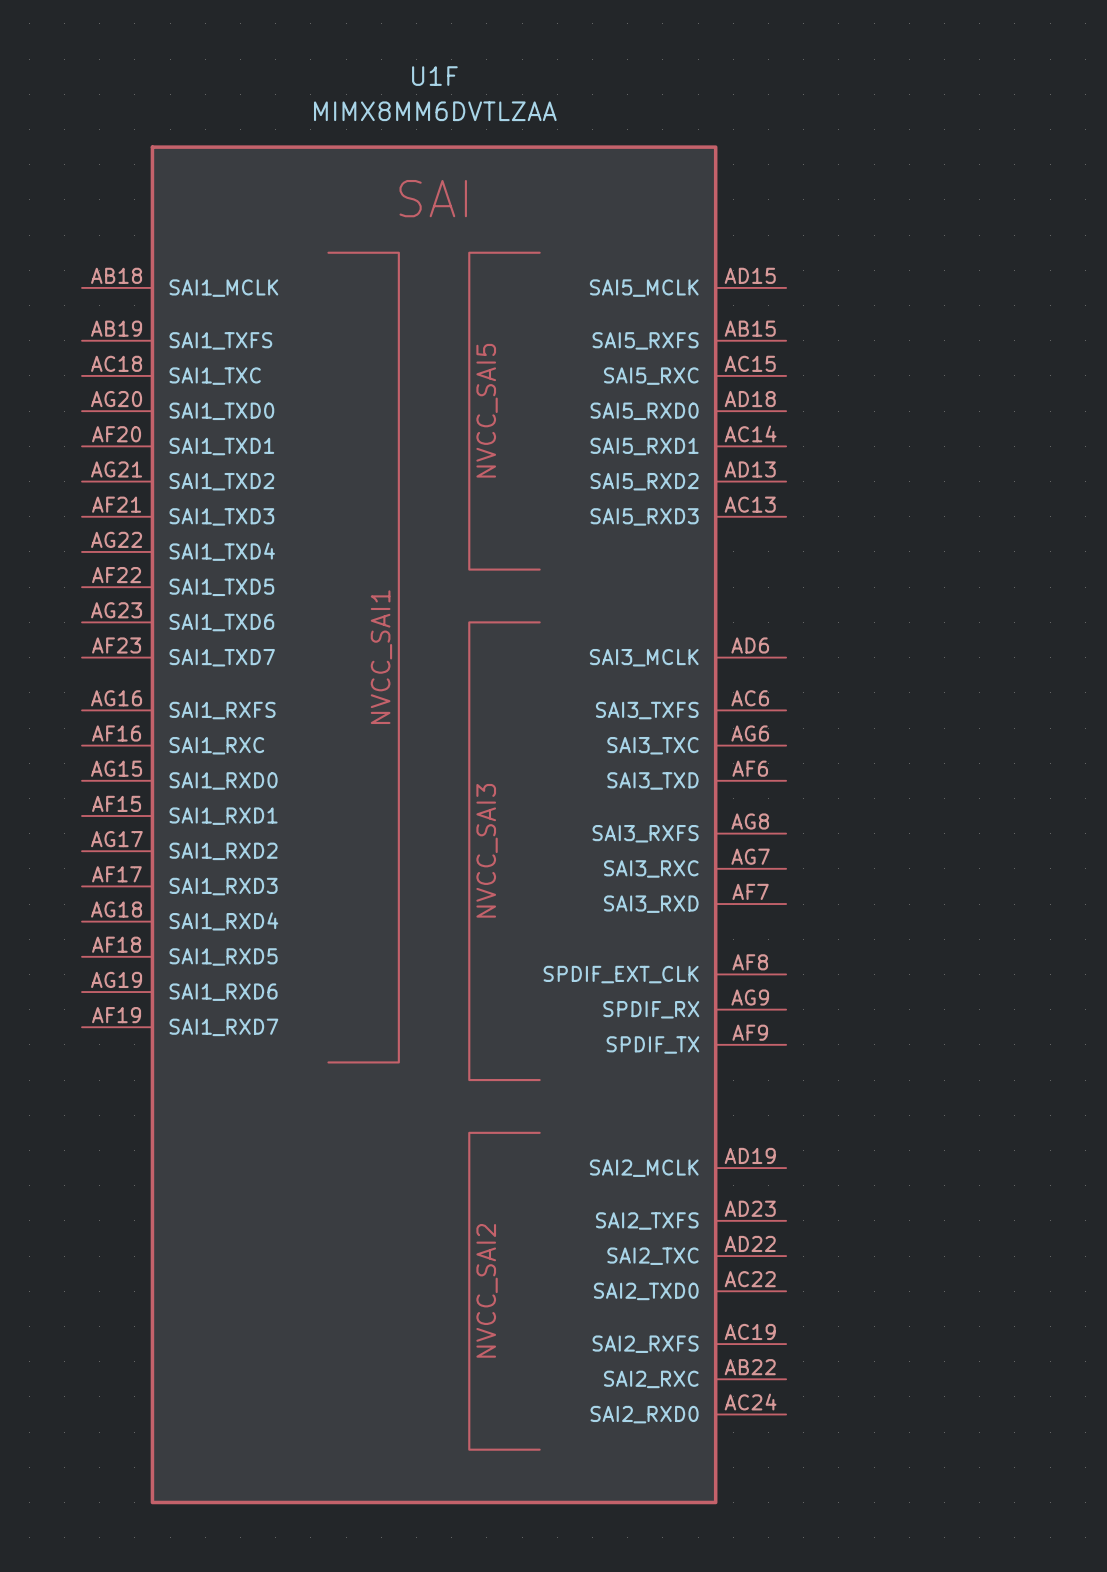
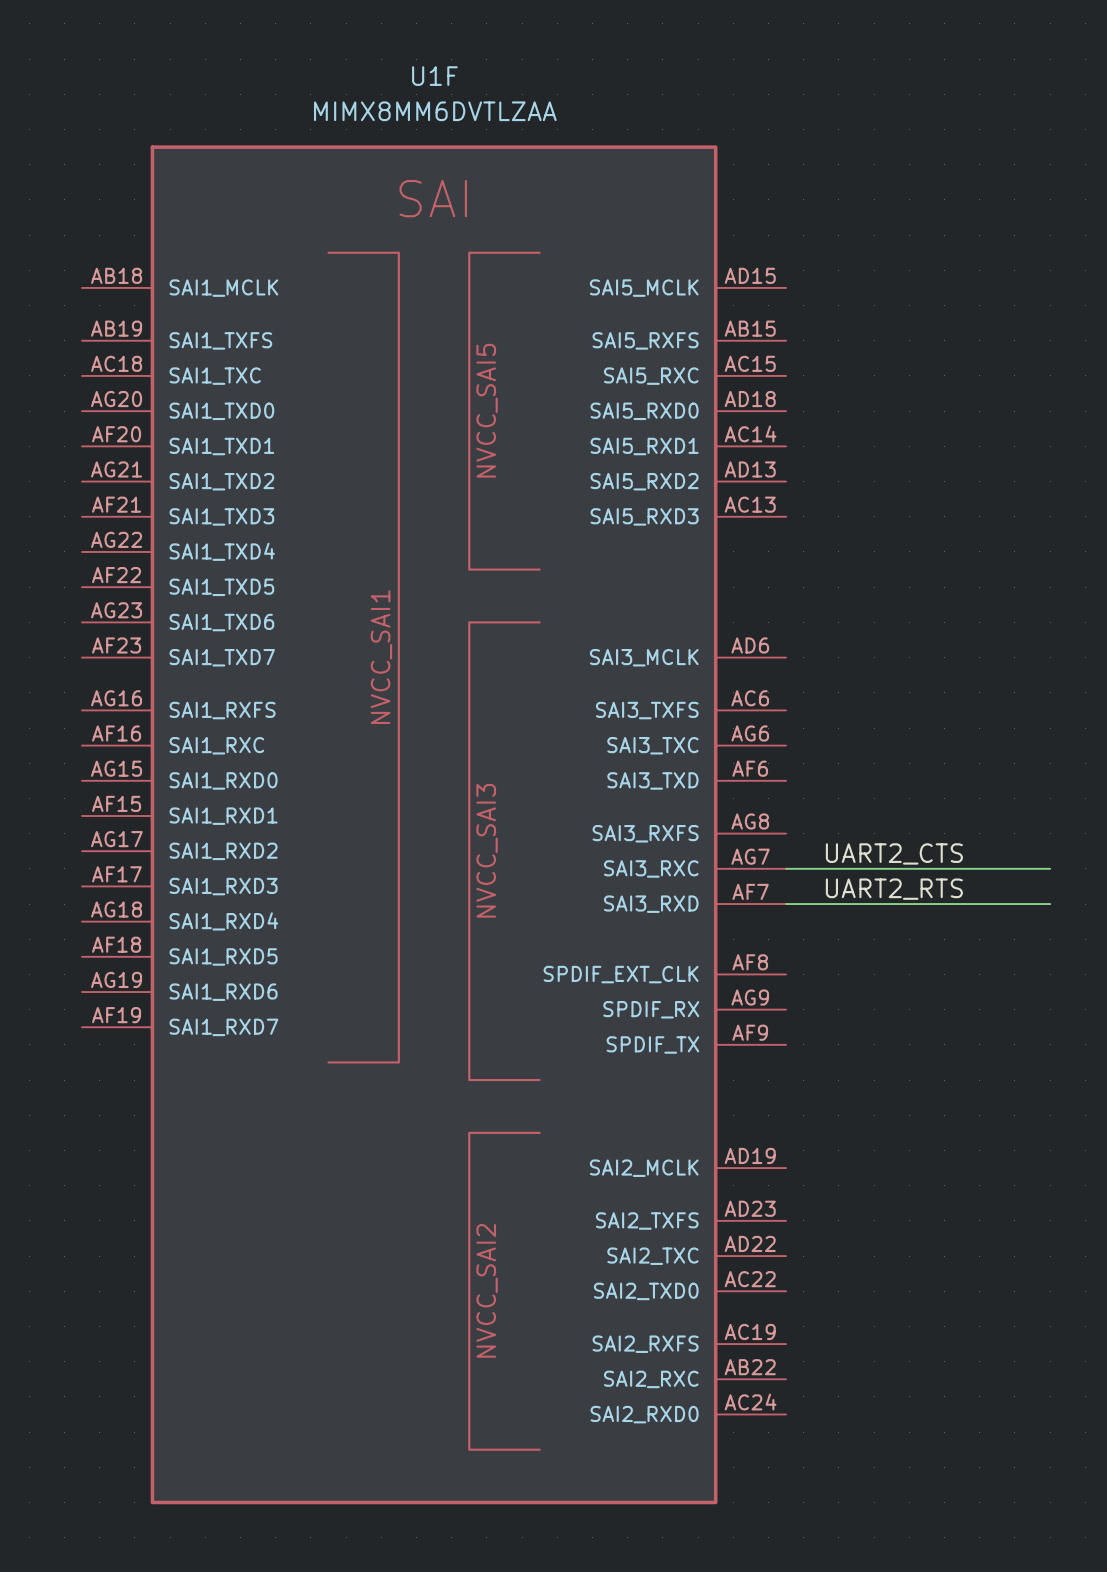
label: none -> UART2_CTS (894, 853)
wire: none -> (786, 868) (1050, 868)
label: none -> UART2_RTS (894, 889)
wire: none -> (786, 904) (1050, 904)

